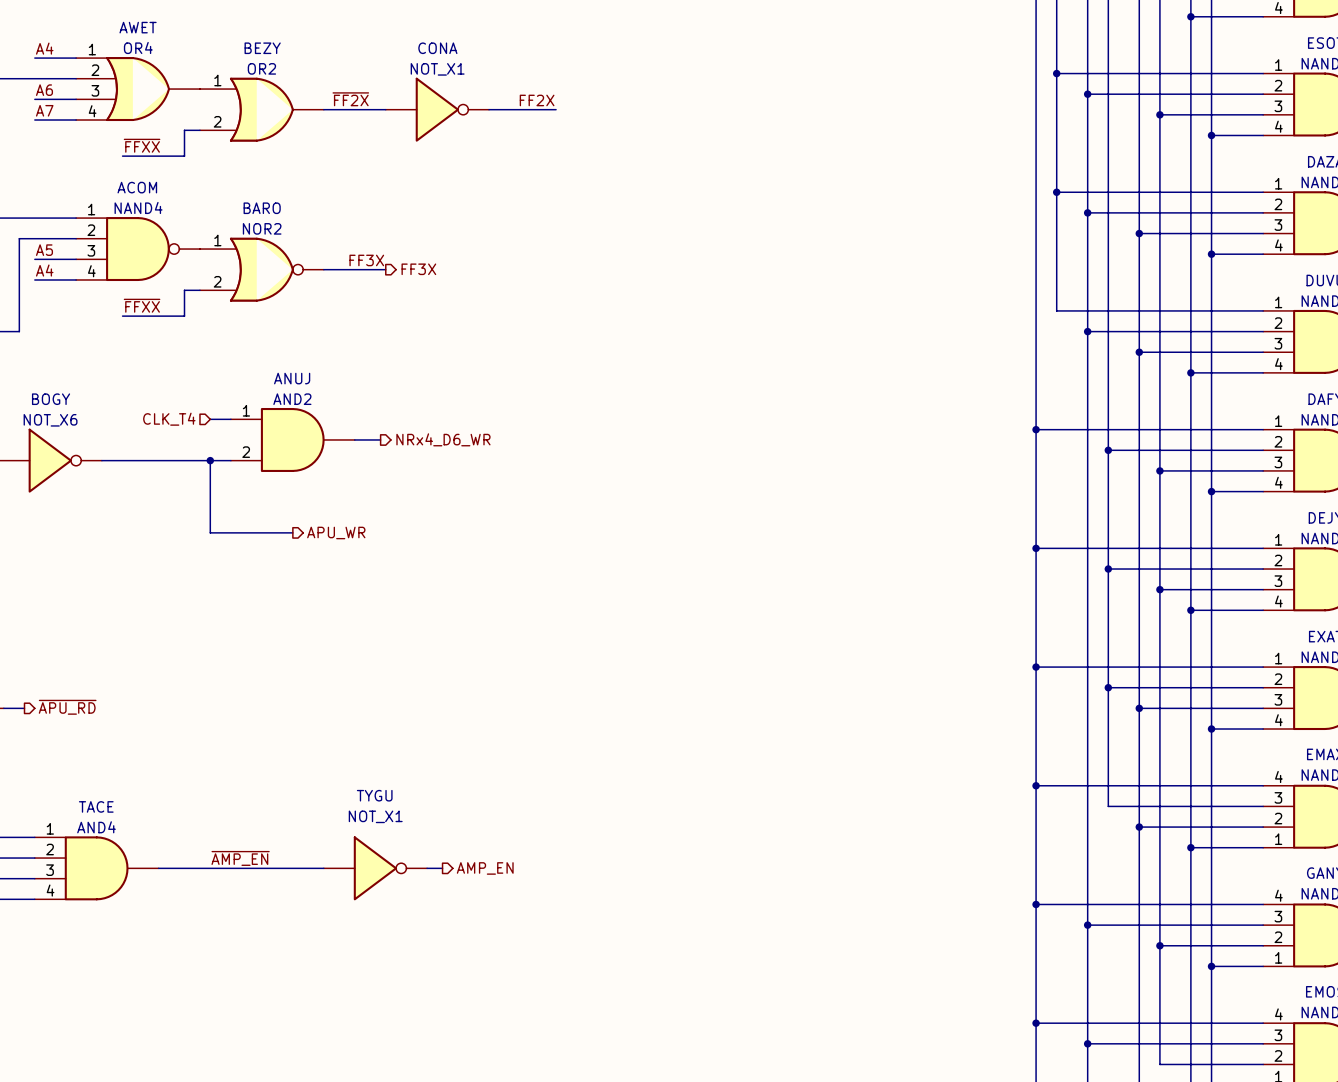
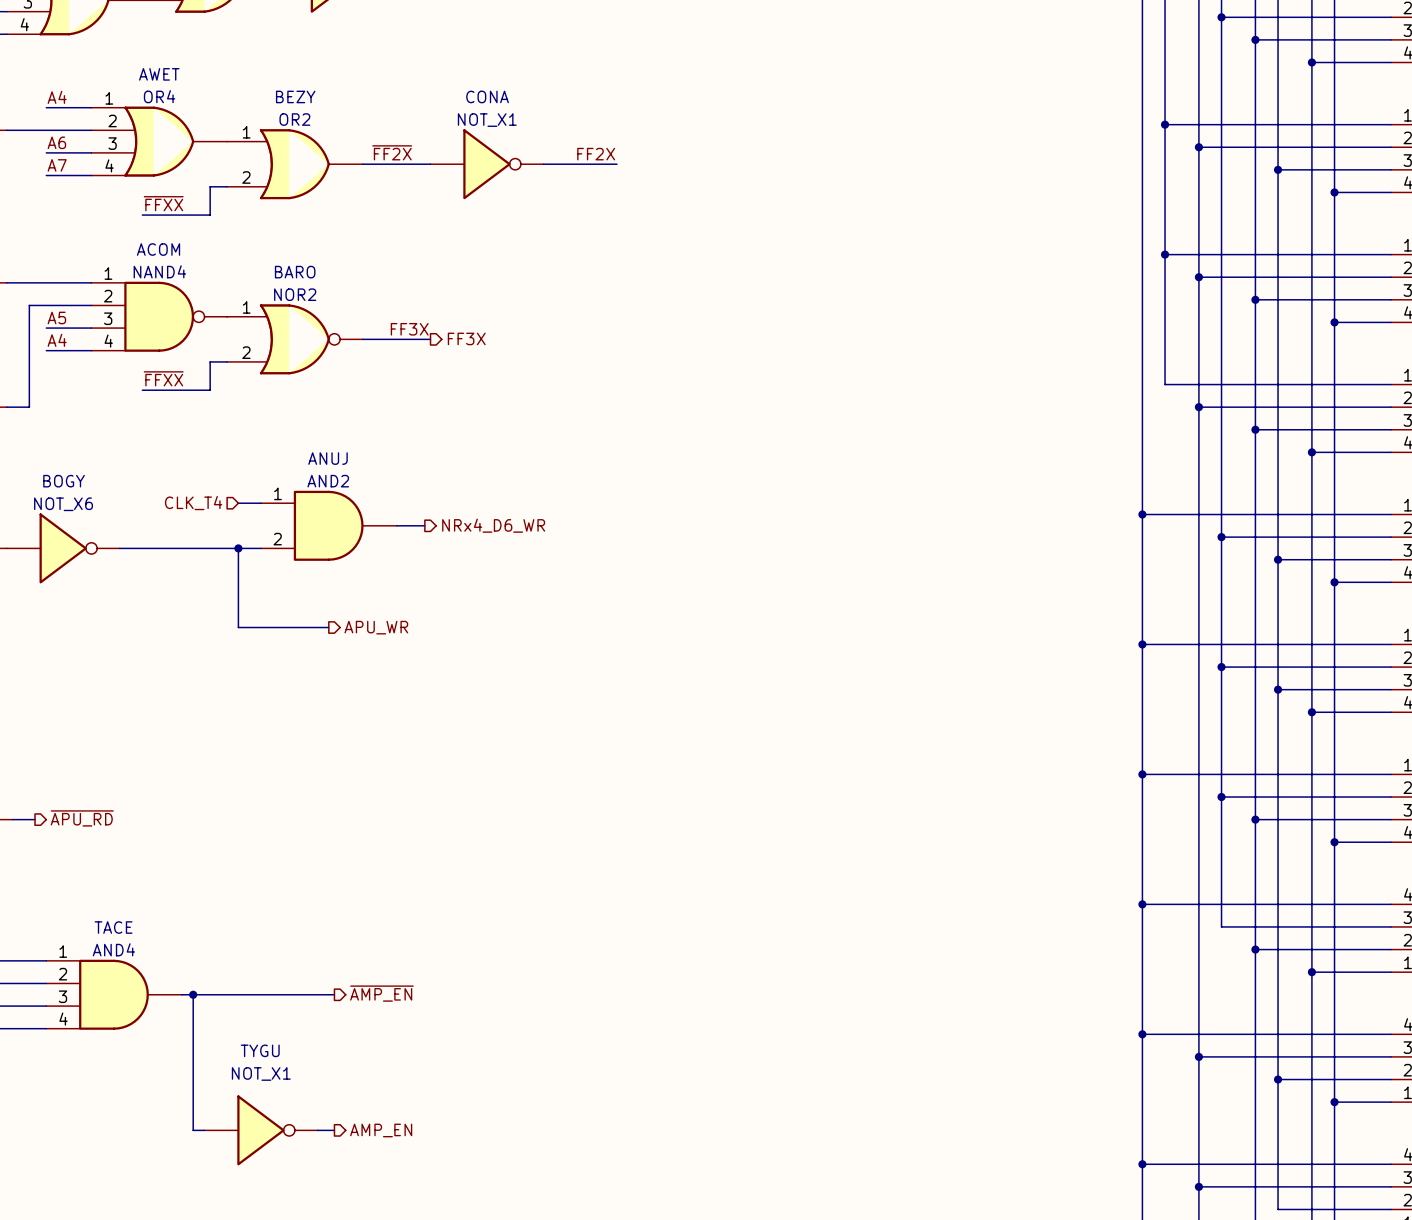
label: ~{AMP_EN} (240, 858) -> none
hierarchical label: none -> ~{AMP_EN} (381, 993)
wire: none -> (193, 994) (193, 1130) (204, 1130)
junction: none -> (193, 994)
wire: (298, 868) (323, 868) -> none
TYGU position: (375, 868) -> (261, 1130)
wire: (427, 868) (442, 868) -> (317, 1130) (334, 1130)
hierarchical label position: AMP_EN (485, 868) -> AMP_EN (381, 1130)

